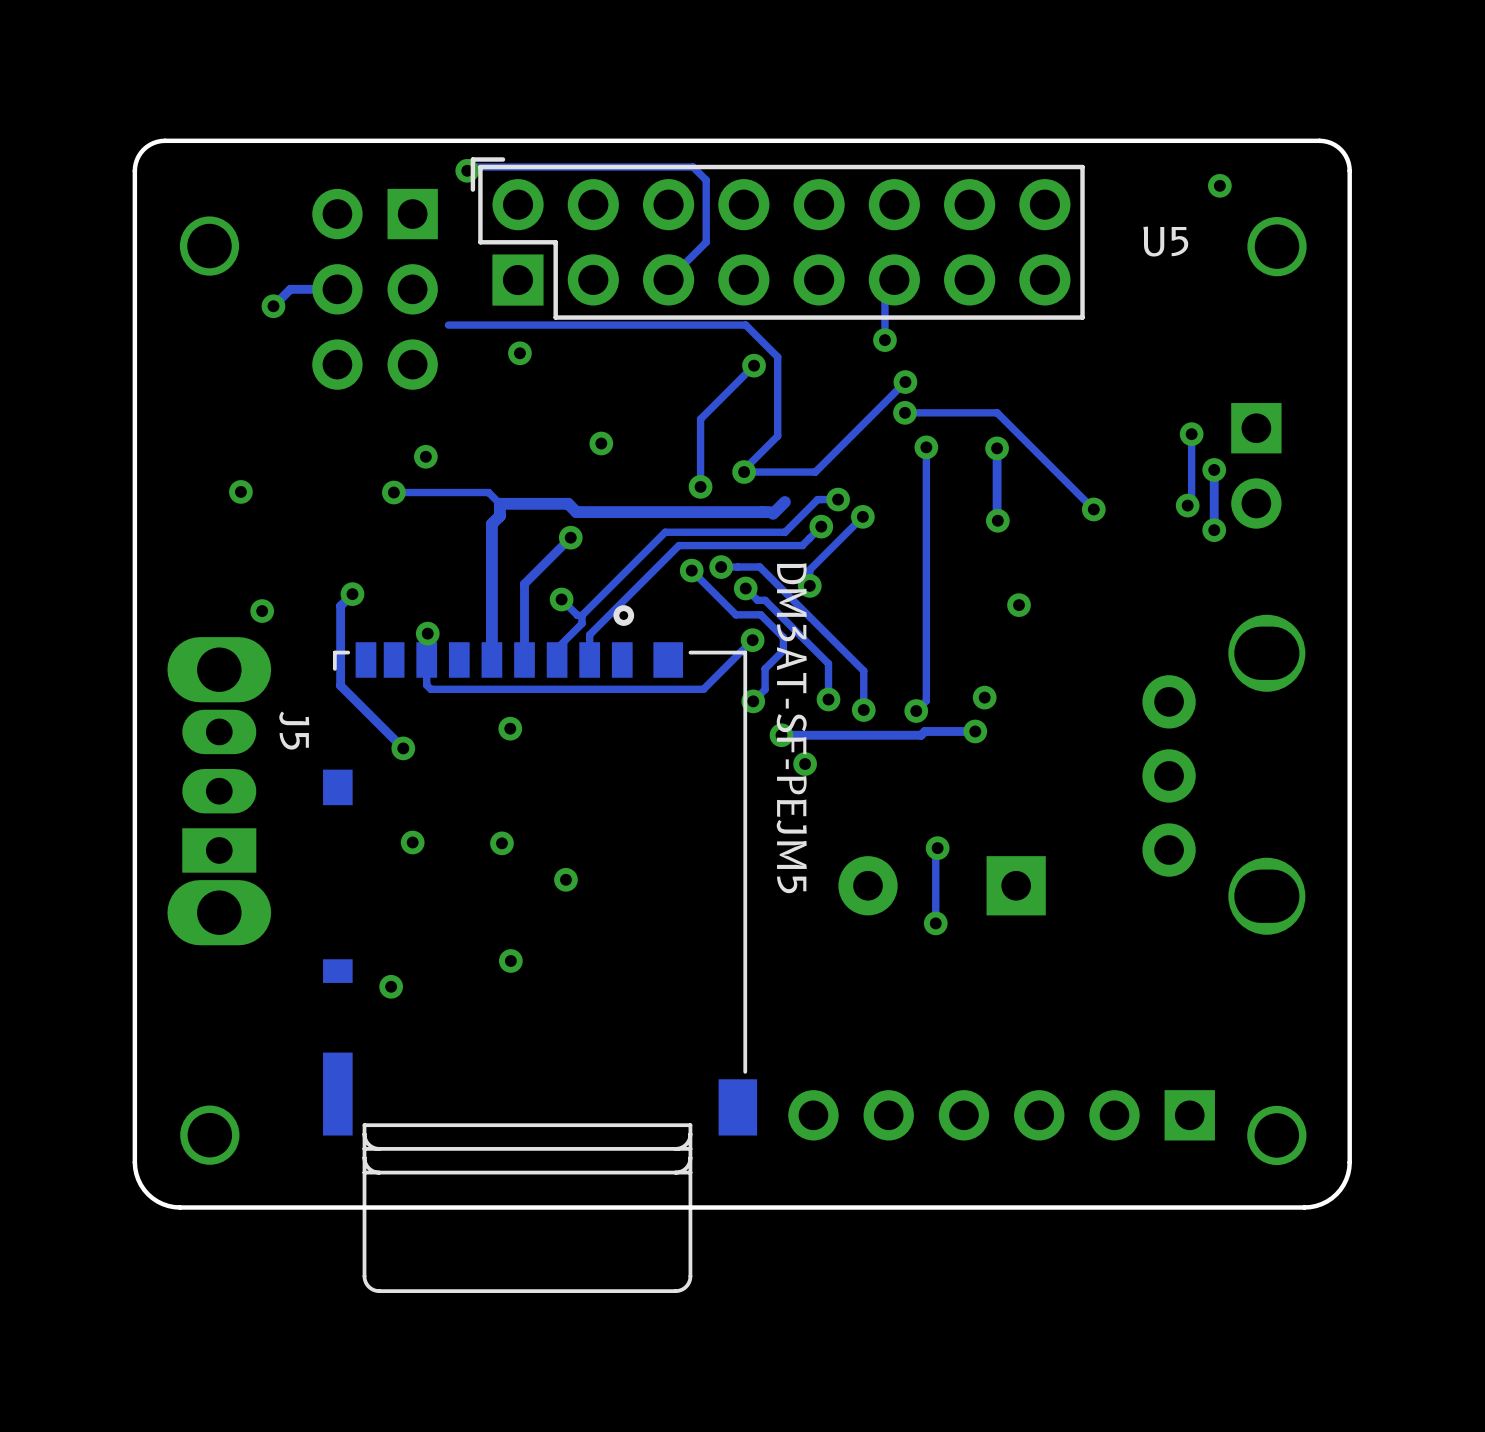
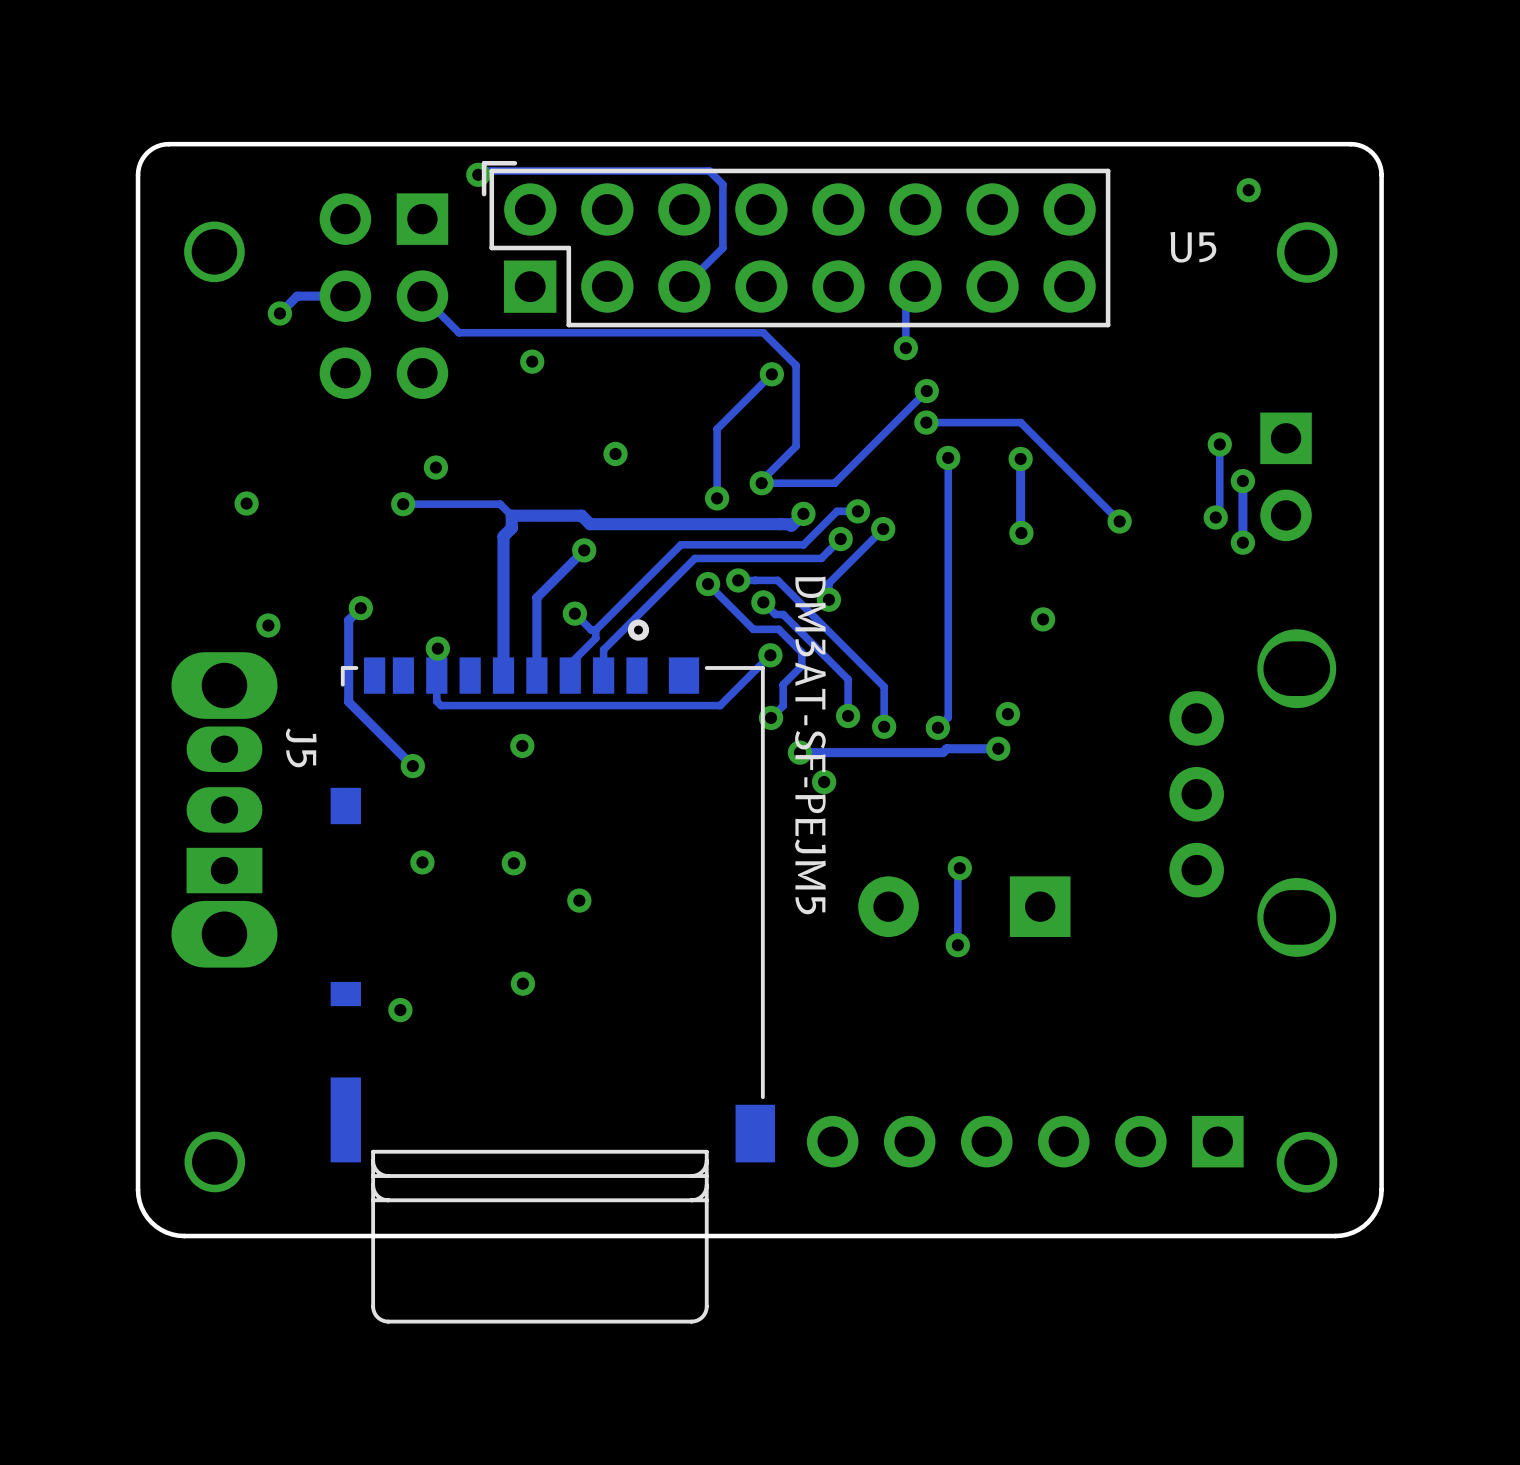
track: none -> (422, 296) (459, 332)
via: none -> (803, 513)

